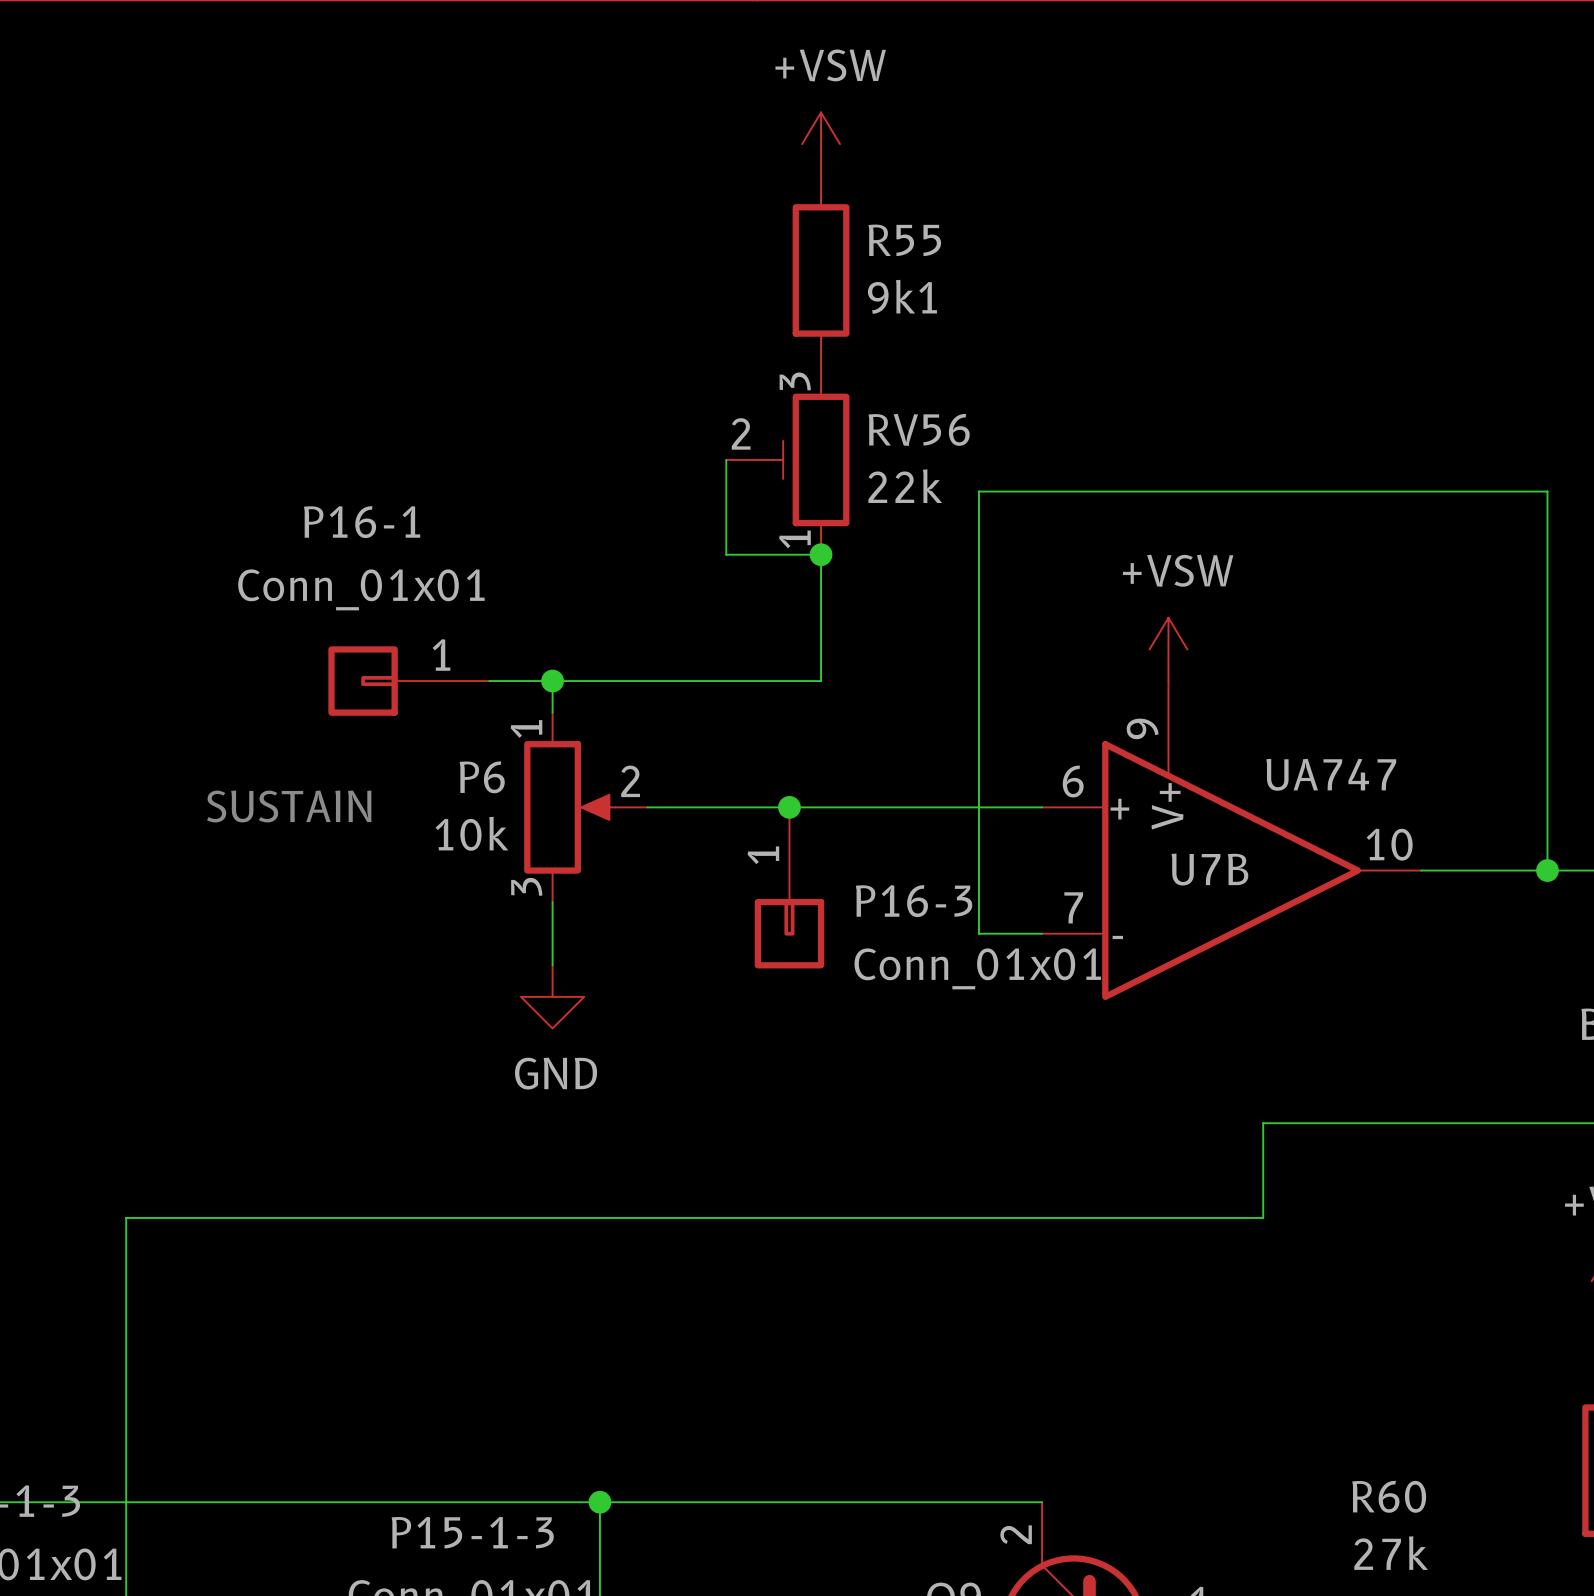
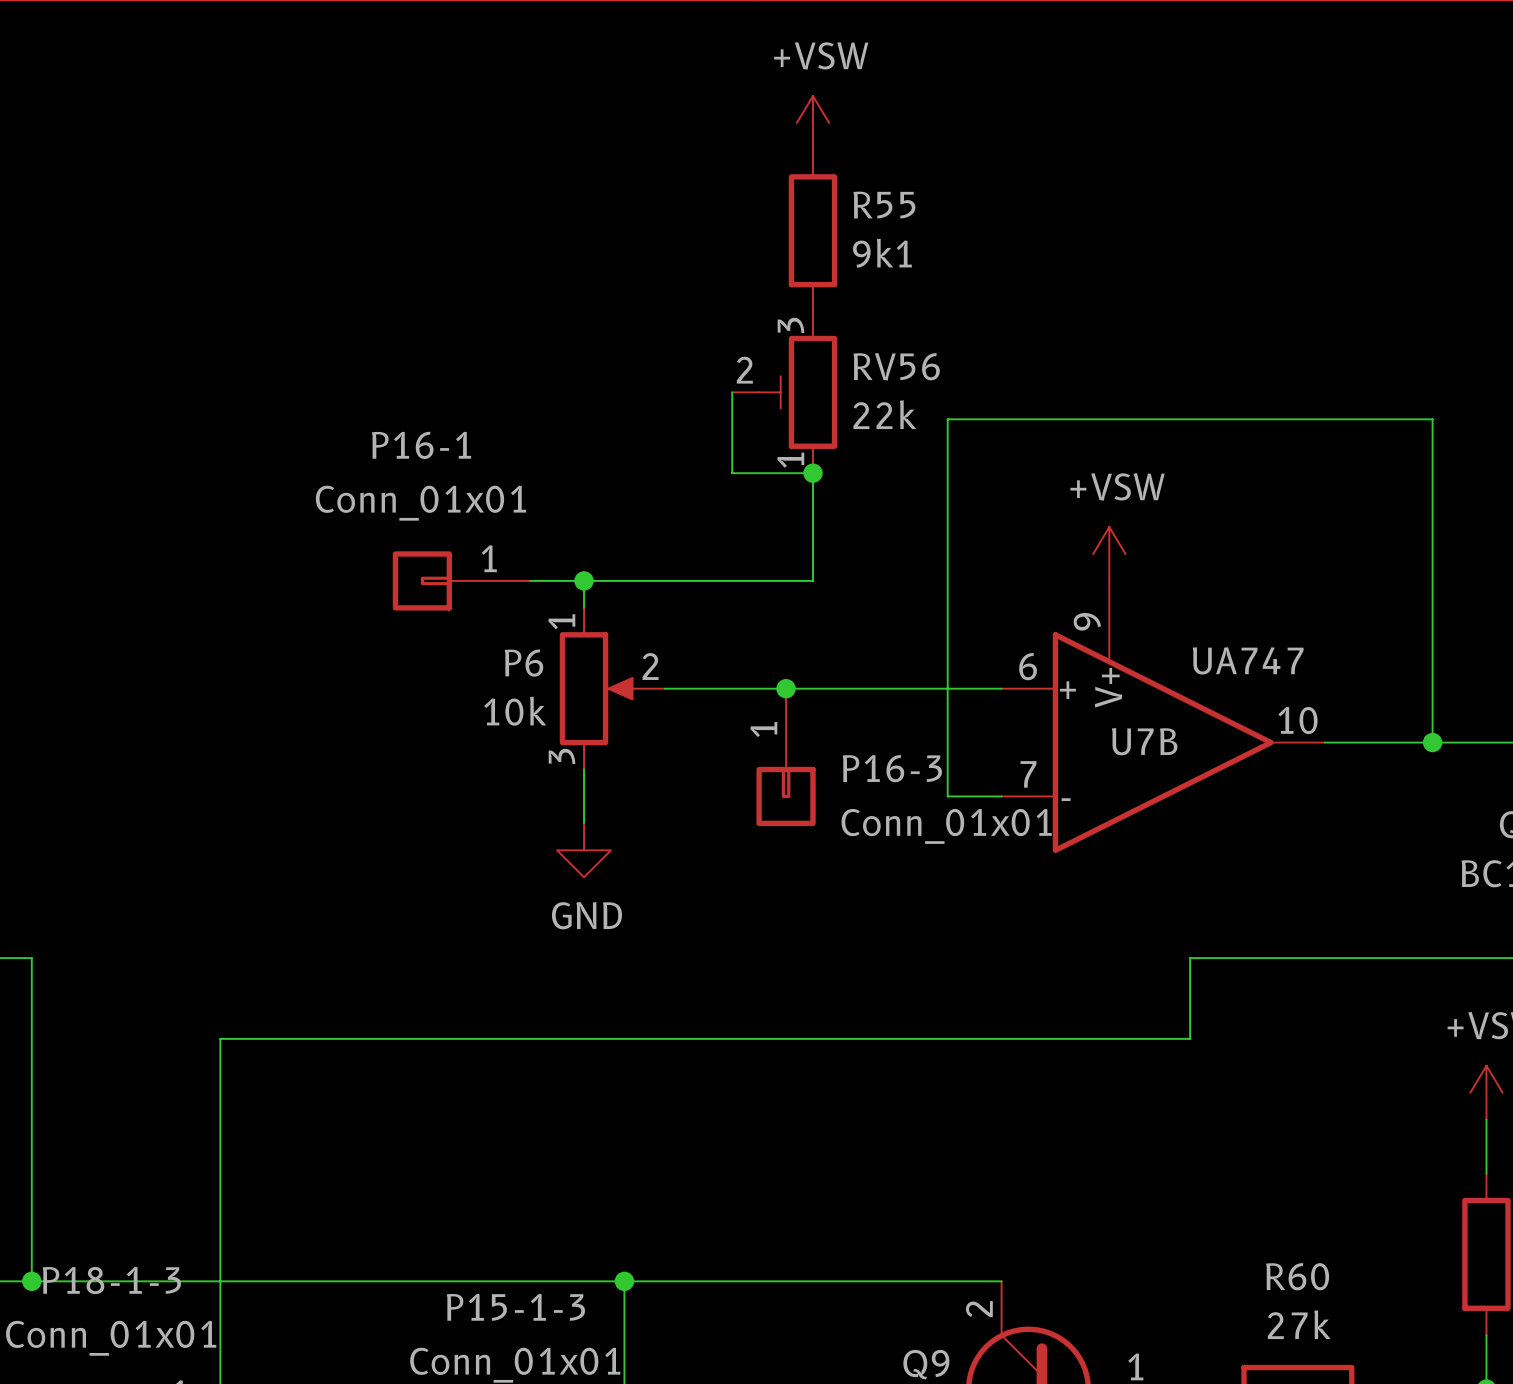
text: SUSTAIN (289, 806) -> none

